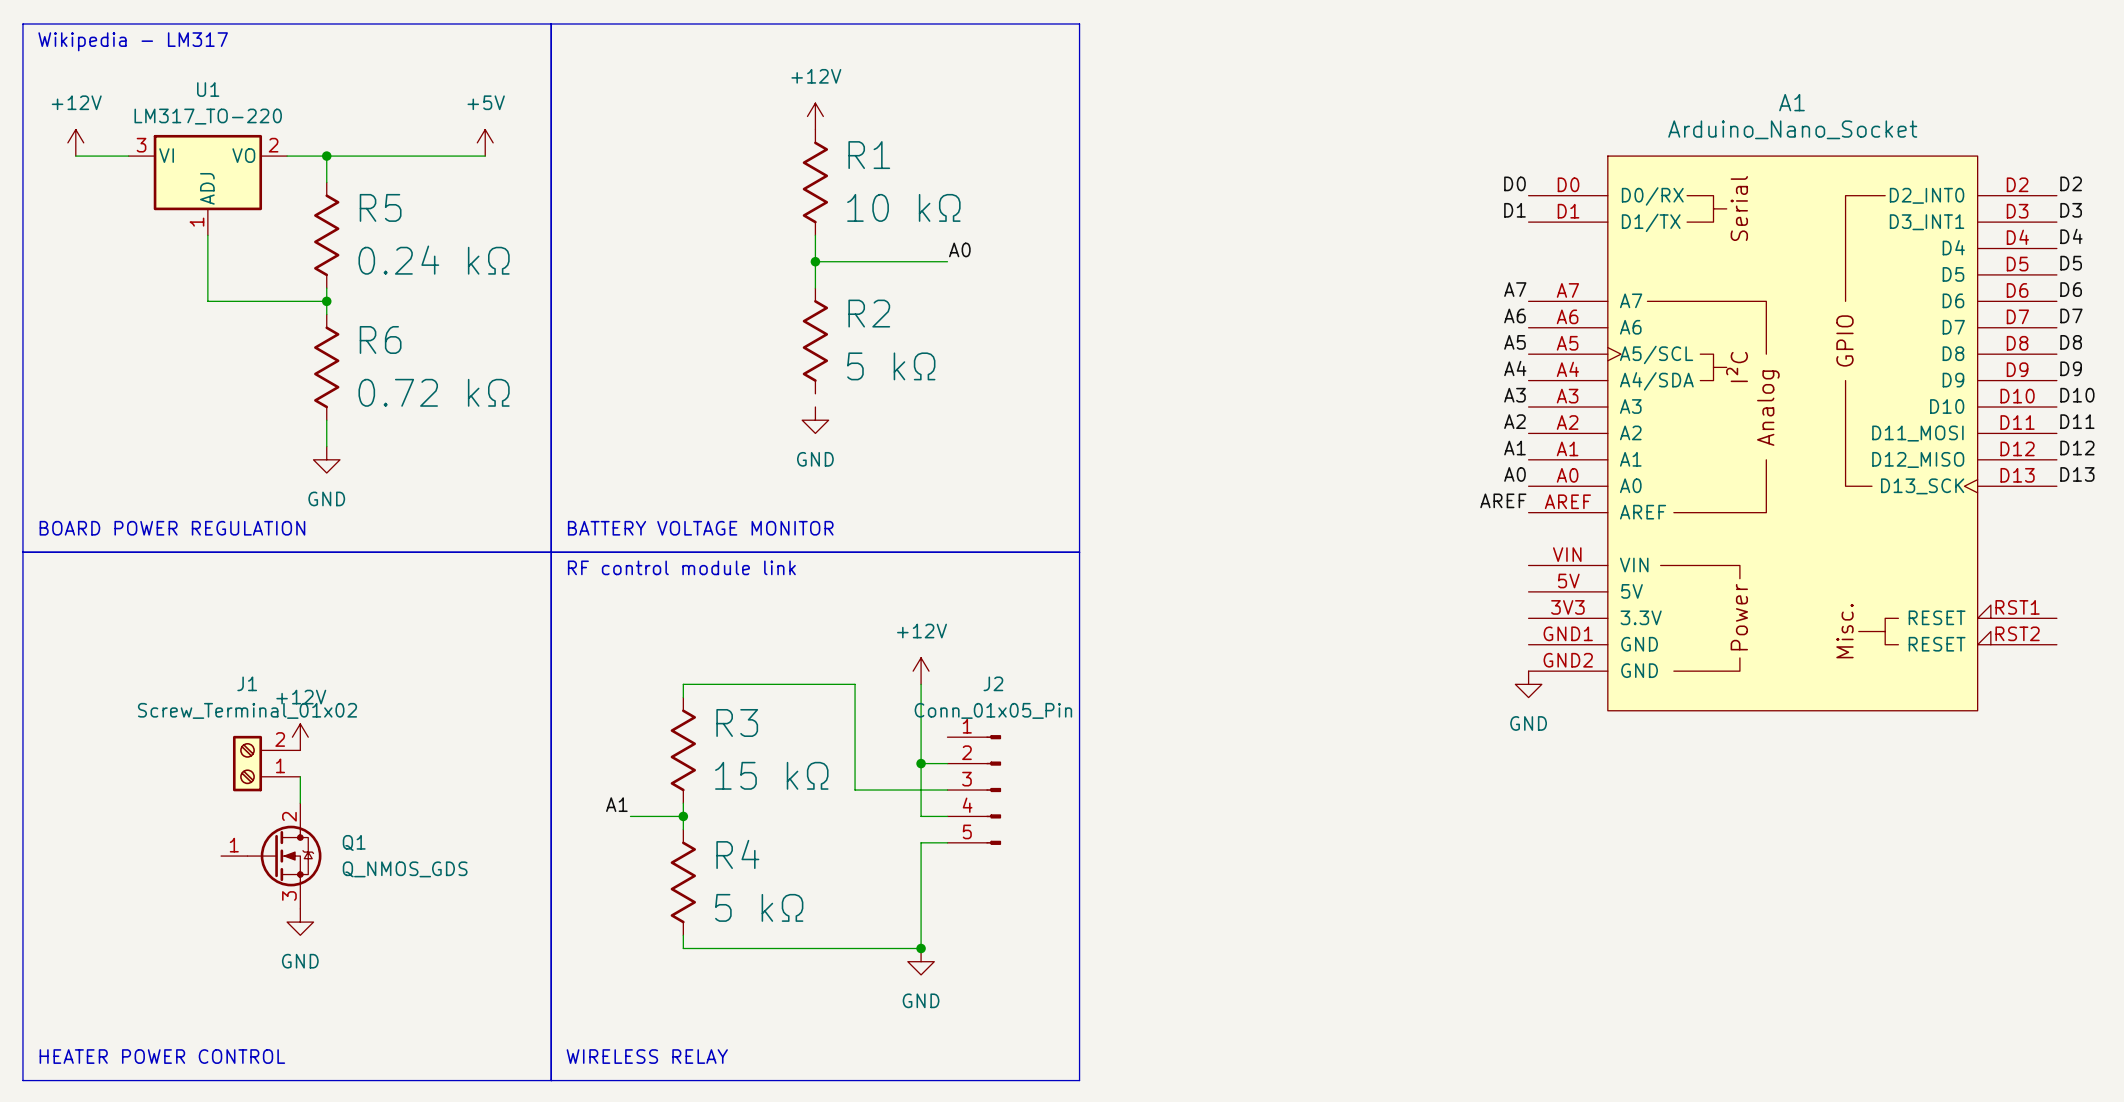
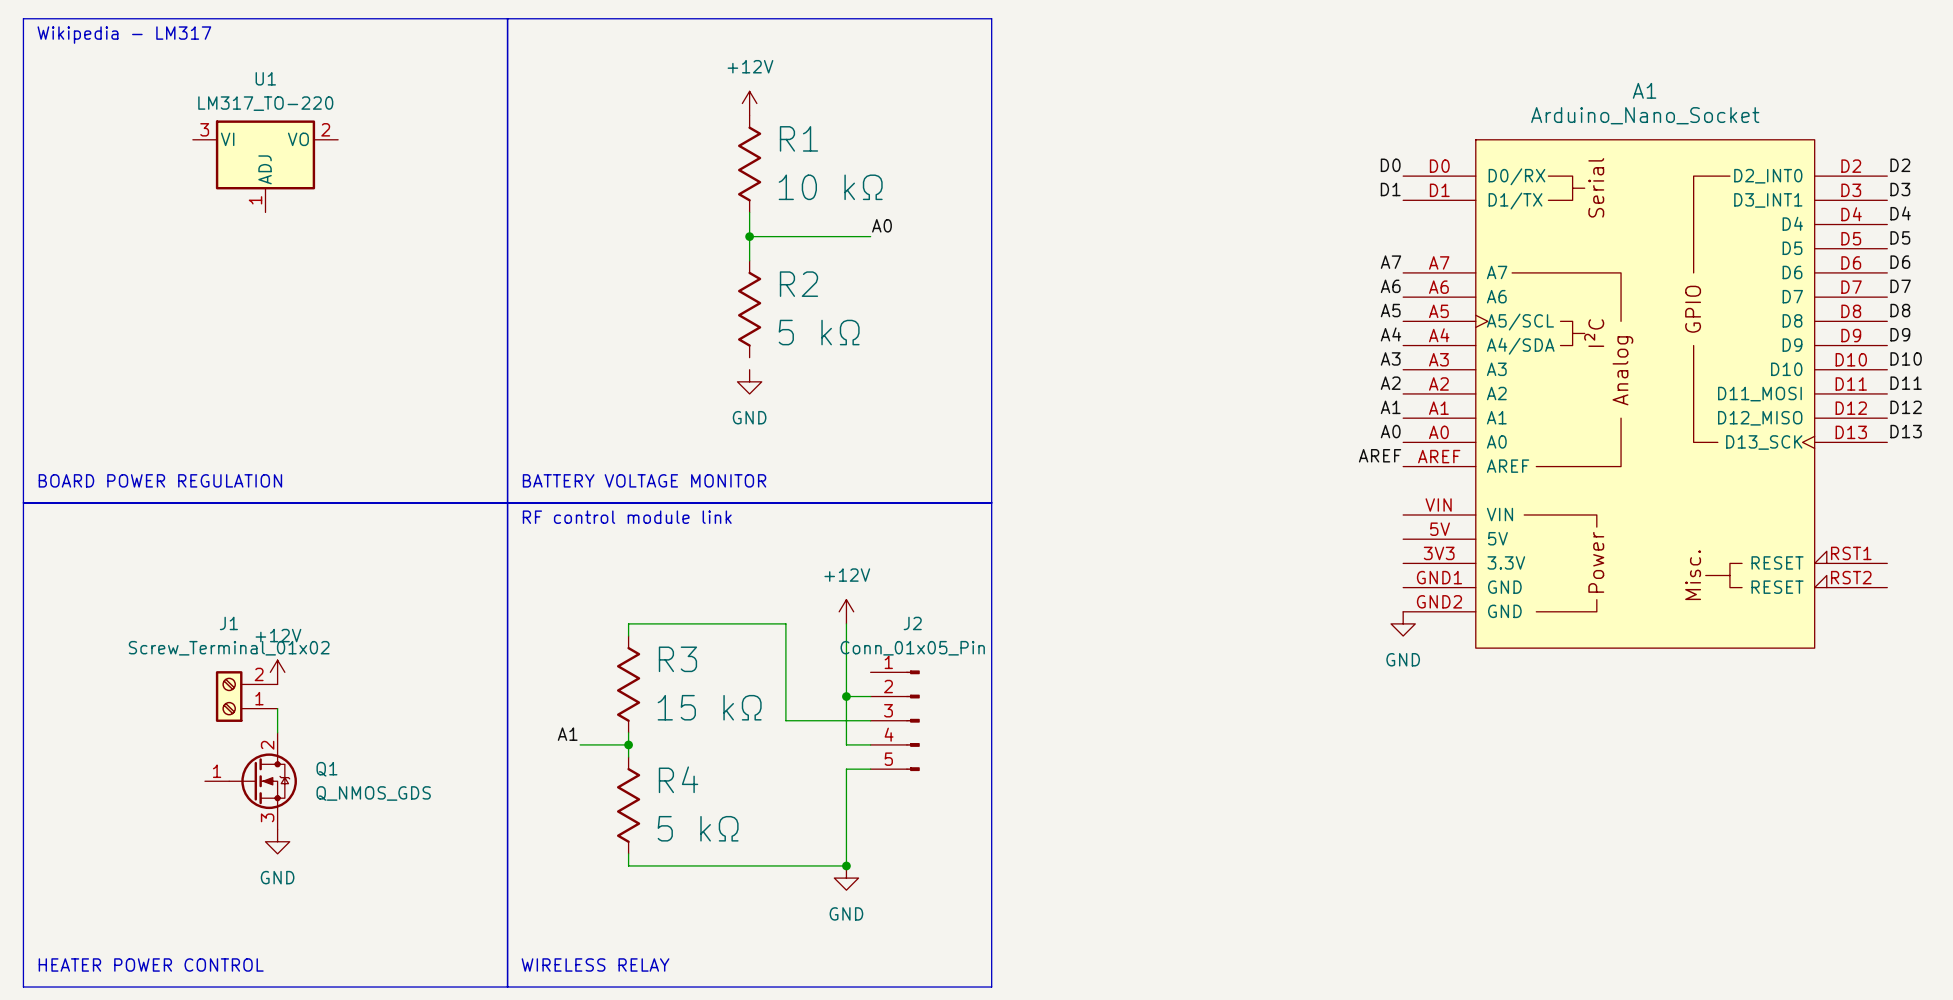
power symbol: +12V (75, 142) -> none
power symbol: +5V (485, 142) -> none
wire: (75, 156) (128, 156) -> none
wire: (287, 156) (485, 156) -> none
junction: (326, 156) -> none
U1 position: (207, 185) -> (265, 166)
wire: (207, 235) (207, 301) (326, 301) -> none
R5: 0.24 kΩ (326, 235) -> none
wire: (326, 288) (326, 314) -> none
junction: (326, 301) -> none
R6: 0.72 kΩ (326, 367) -> none
wire: (326, 420) (326, 446) -> none
power symbol: GND (326, 459) -> none

